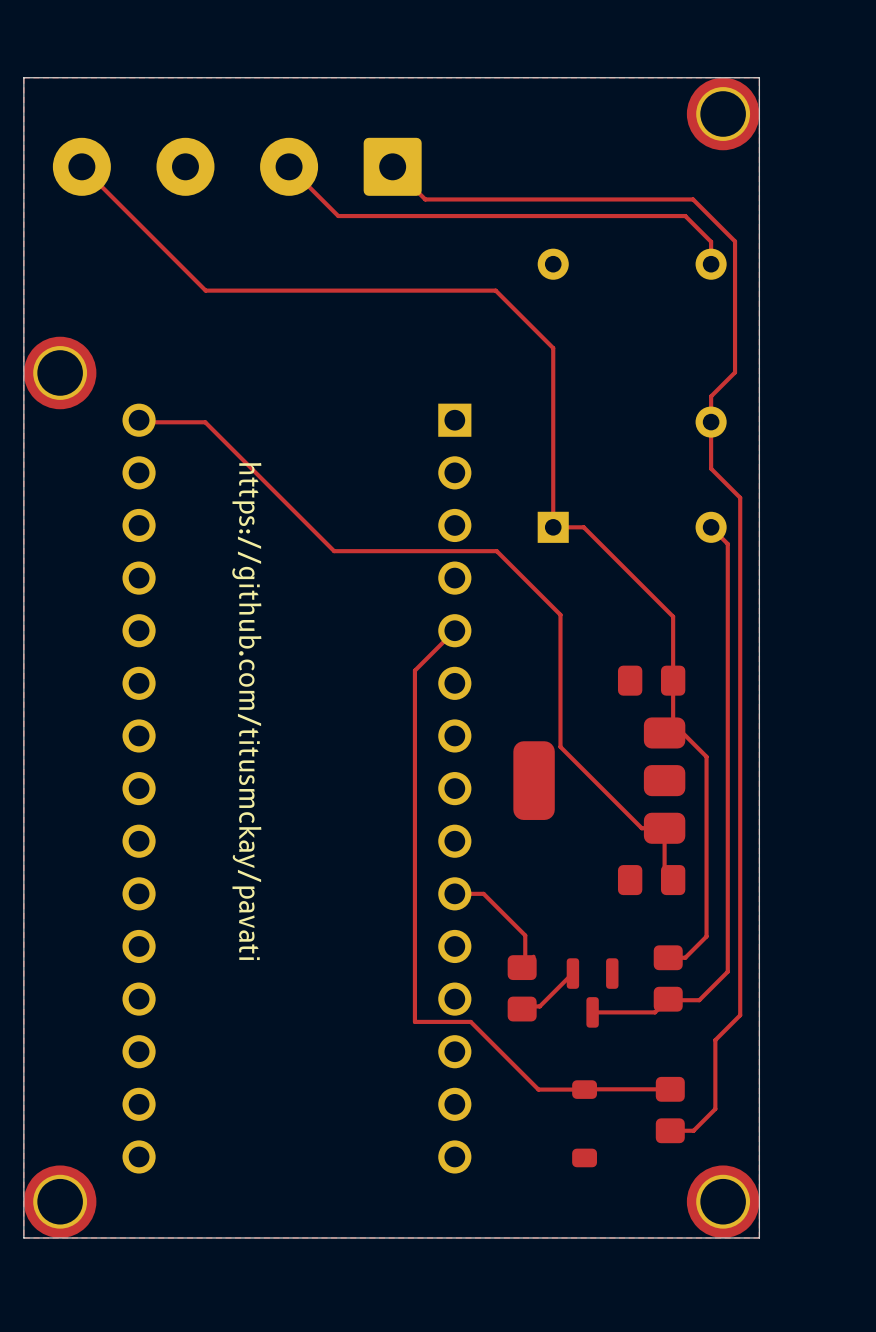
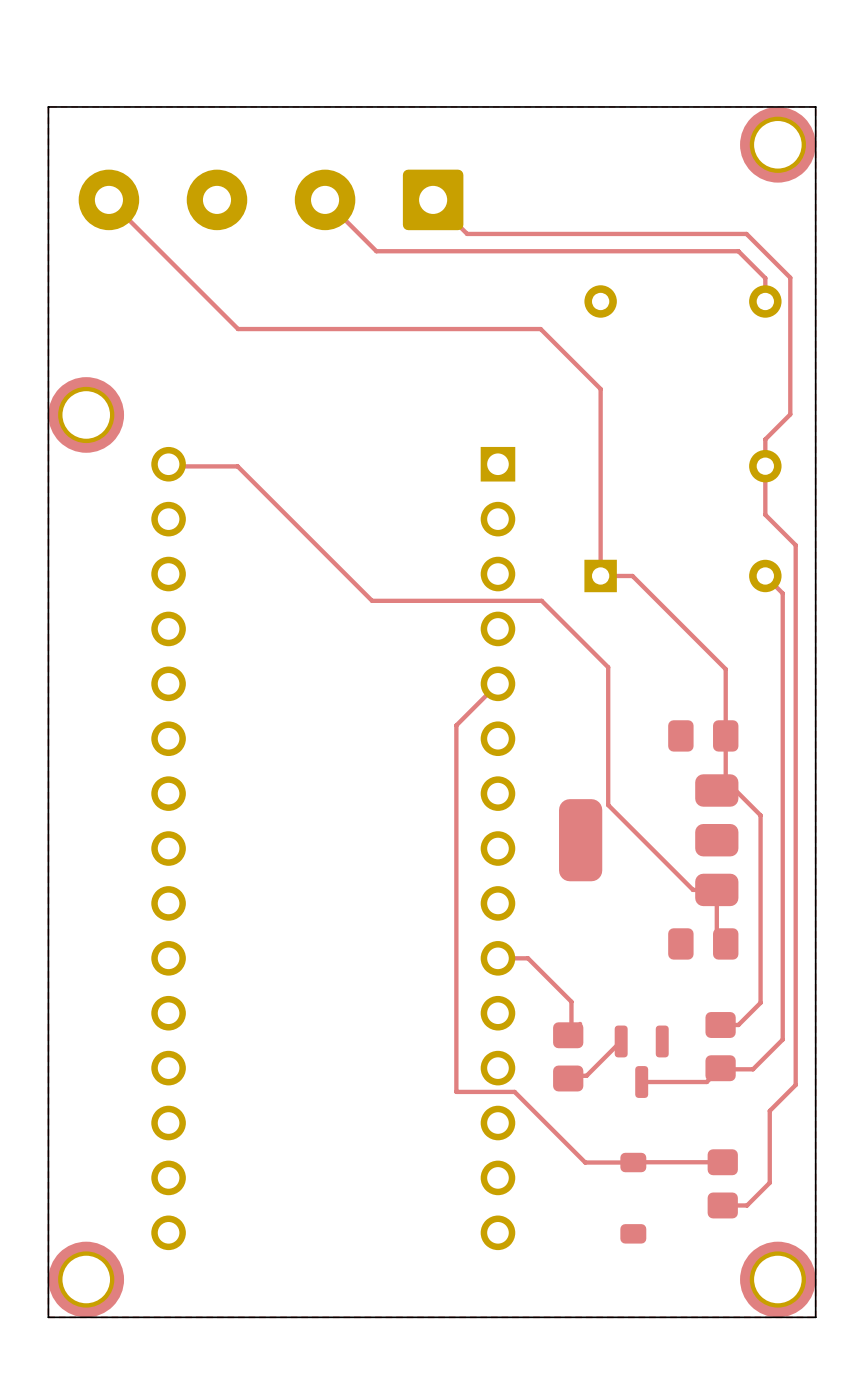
text: https://github.com/titusmckay/pavati (246, 711) -> none

